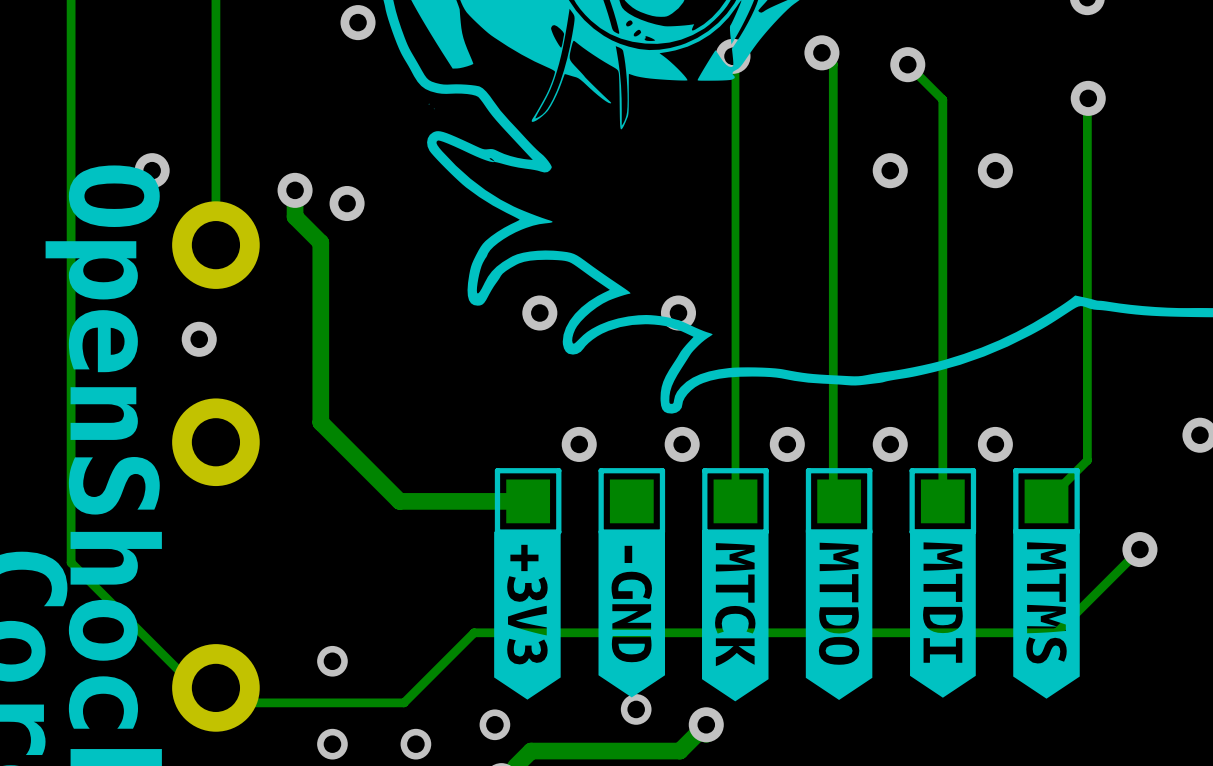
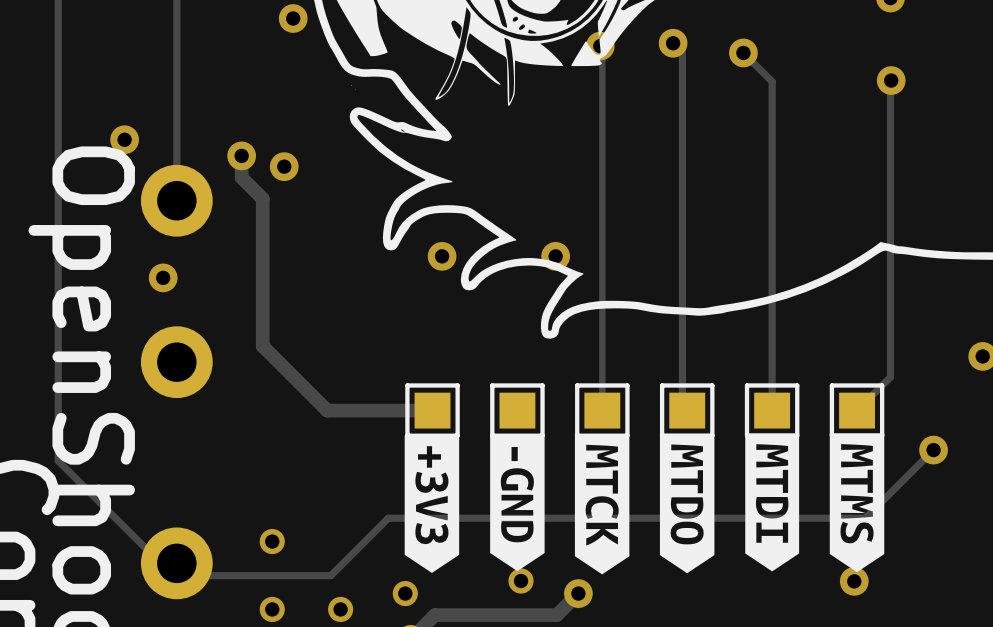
via: (890, 170) -> none
via: (995, 170) -> none
via: (579, 444) -> none
via: (682, 444) -> none
via: (787, 444) -> none
via: (890, 444) -> none
via: (995, 444) -> none
via: none -> (854, 581)

